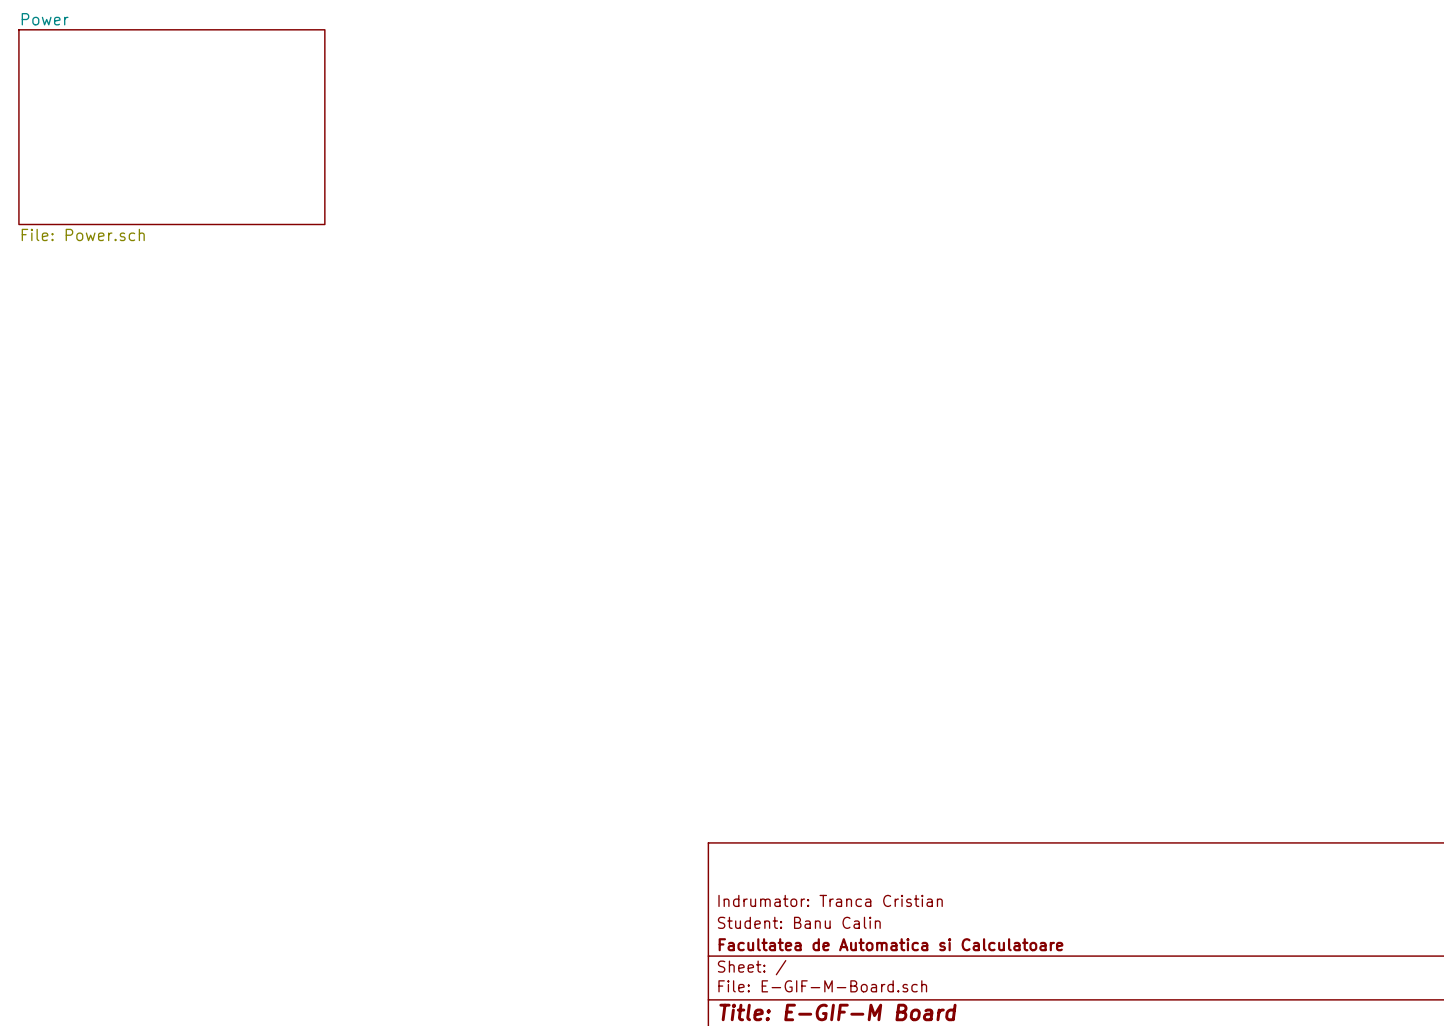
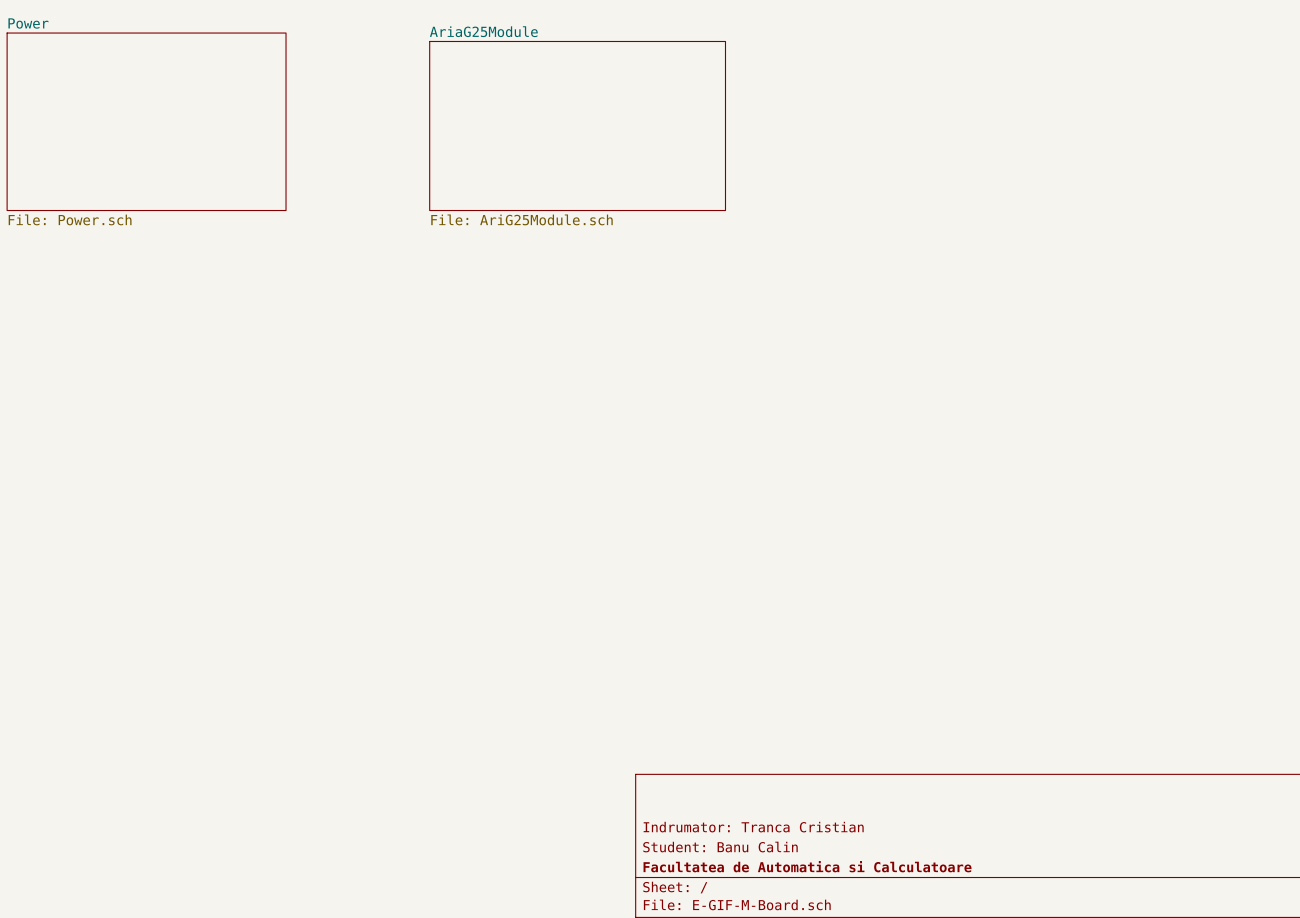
sheet AriaG25Module: none -> File: AriG25Module.sch (577, 126)

